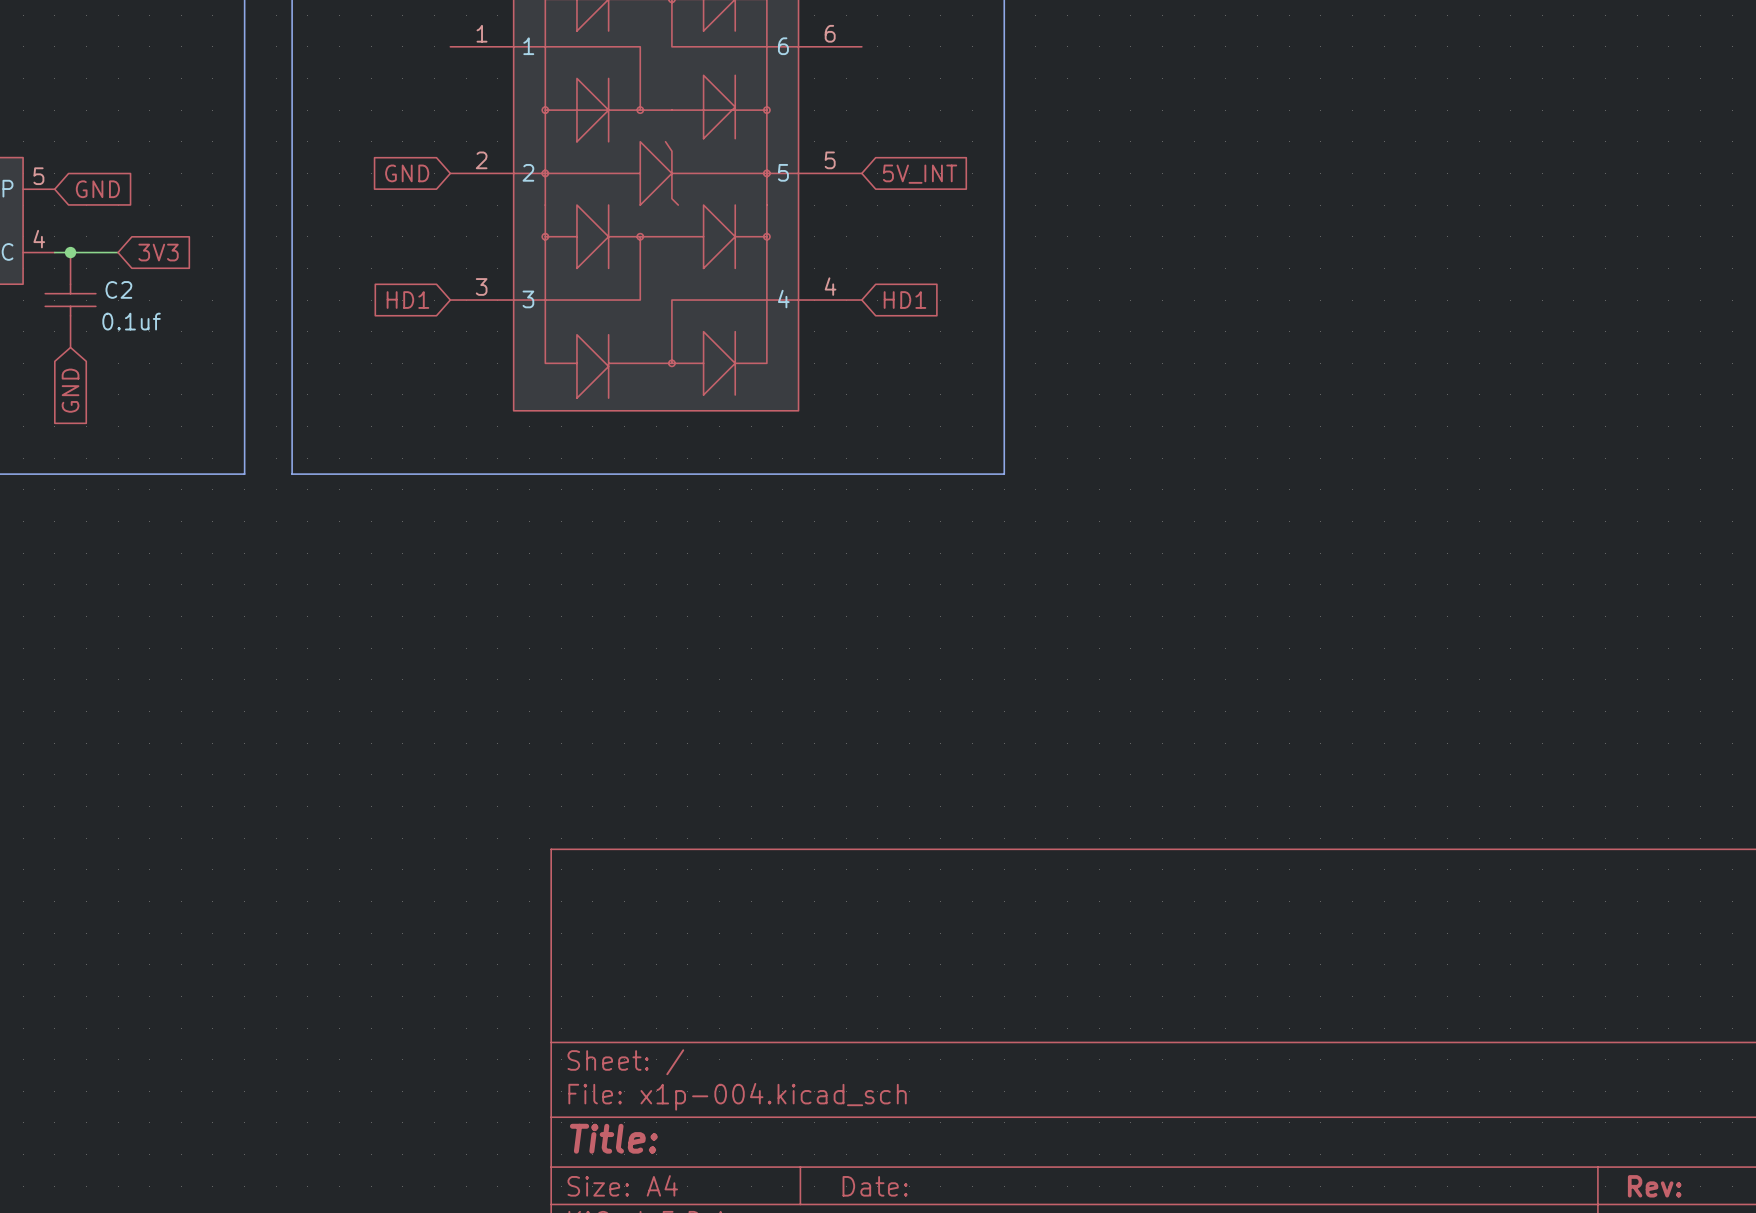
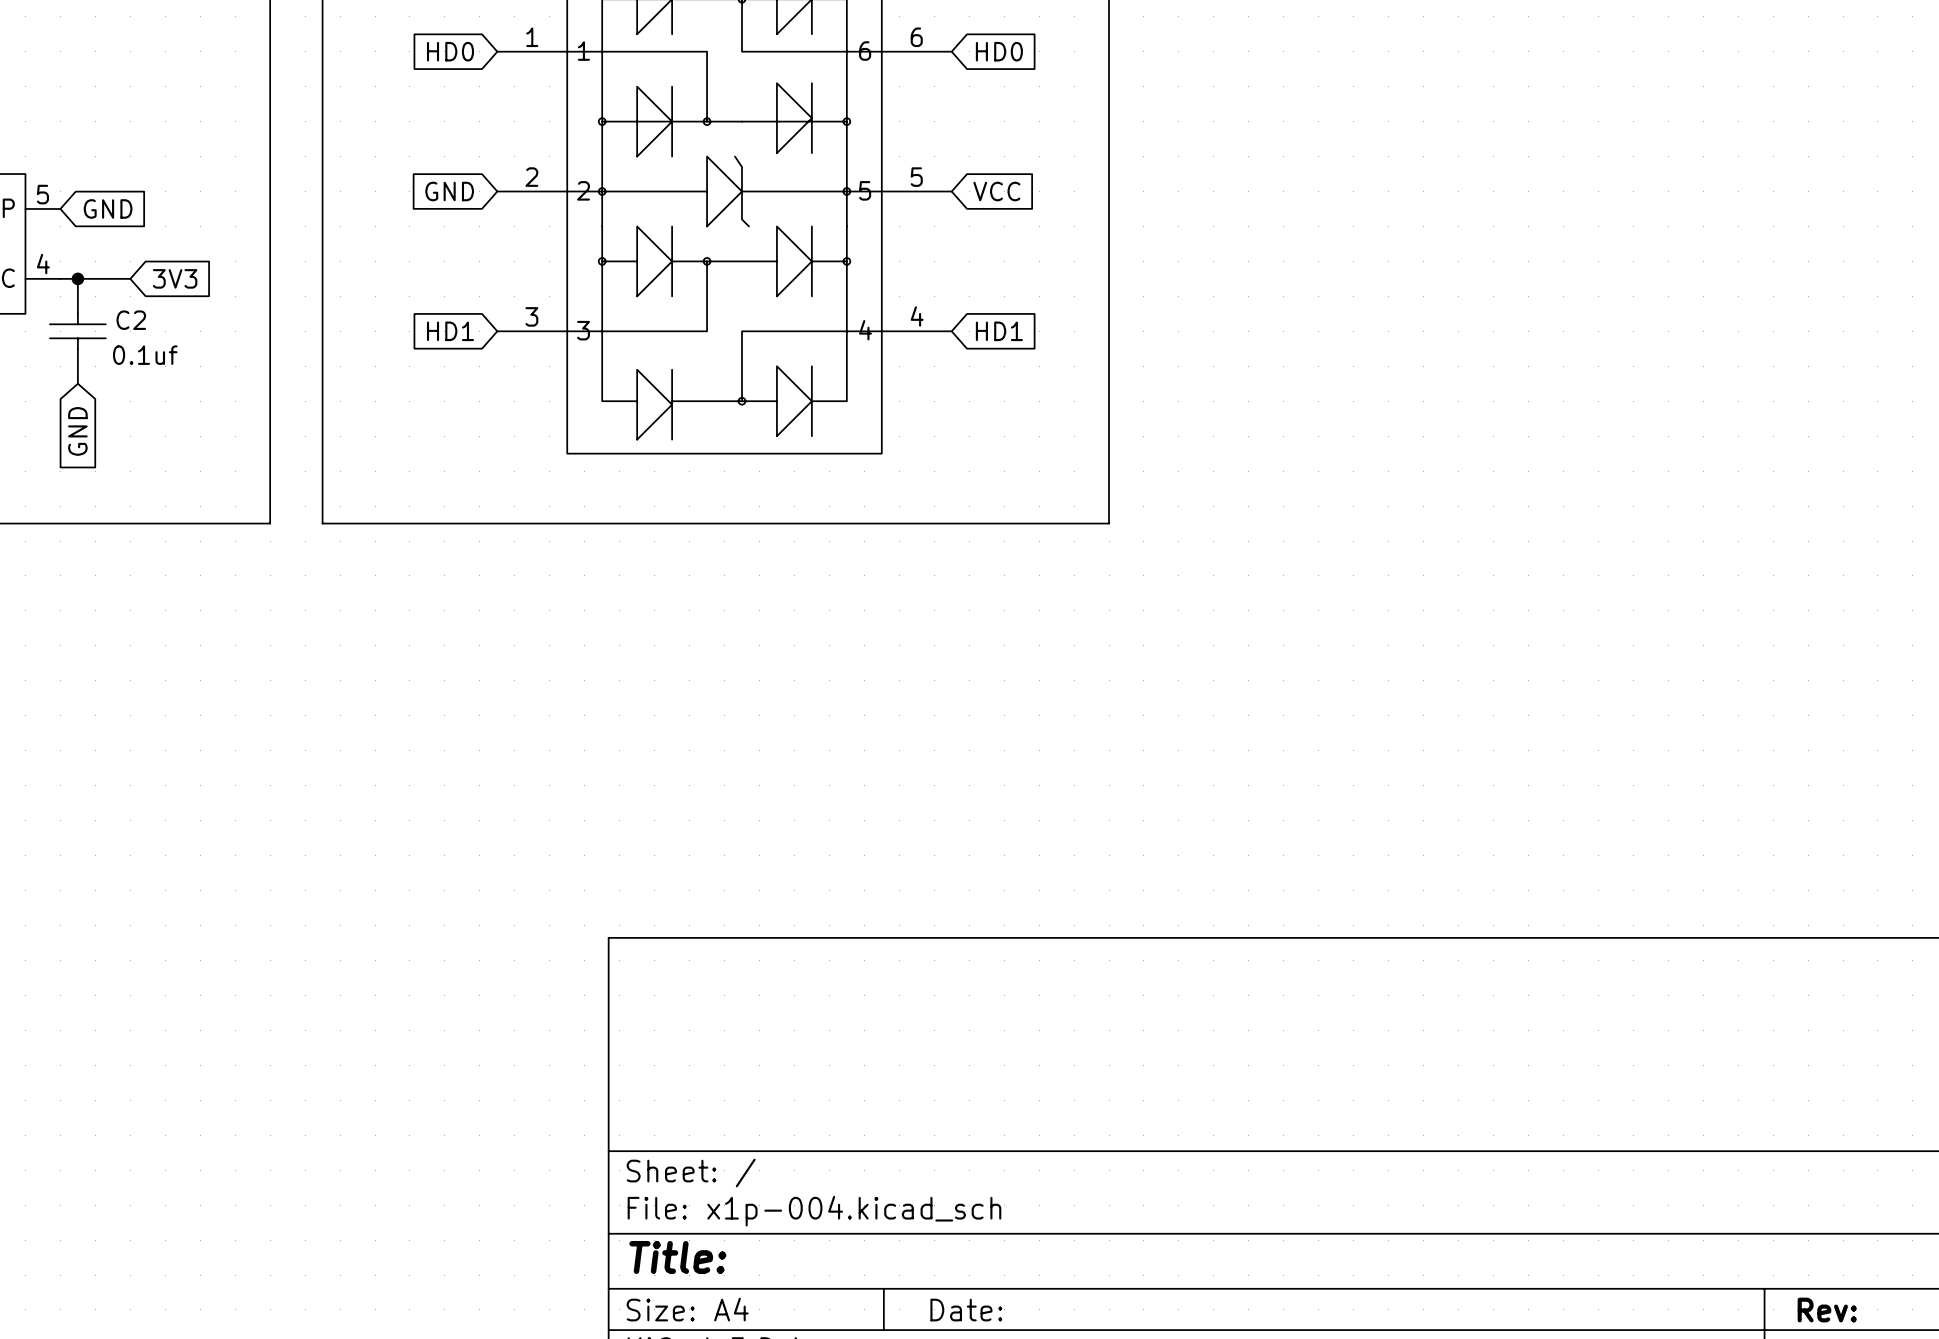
global label: none -> HD0 (450, 51)
global label: none -> HD0 (999, 51)
global label: 5V_INT (920, 174) -> VCC (996, 191)

